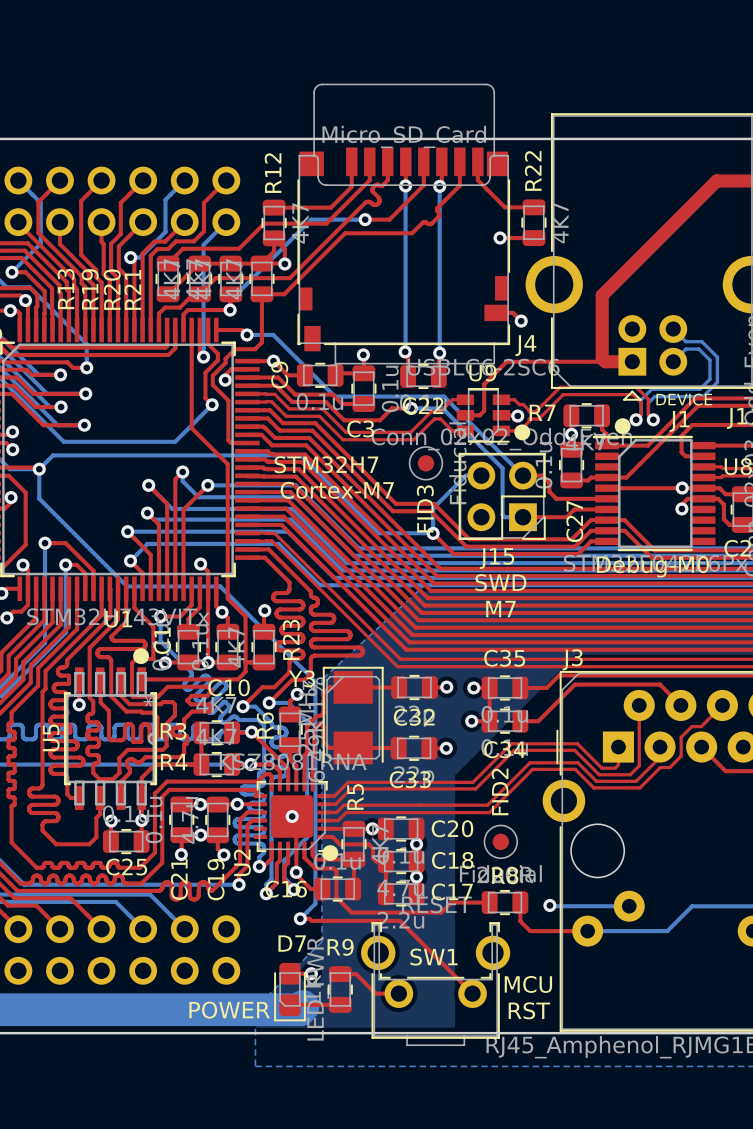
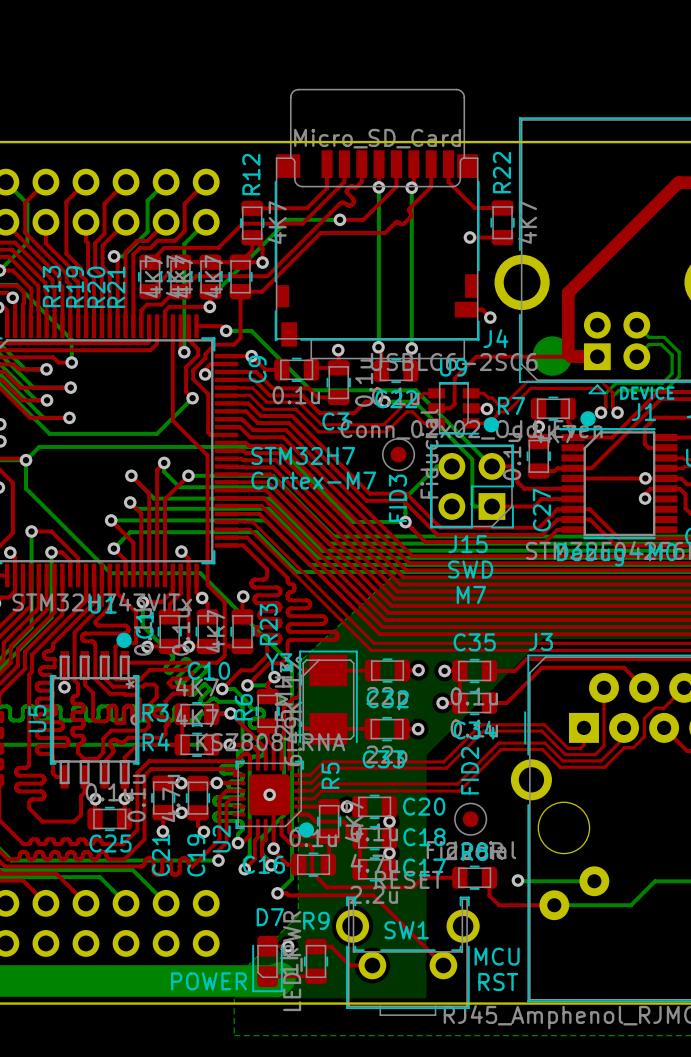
part: none -> (552, 356)

